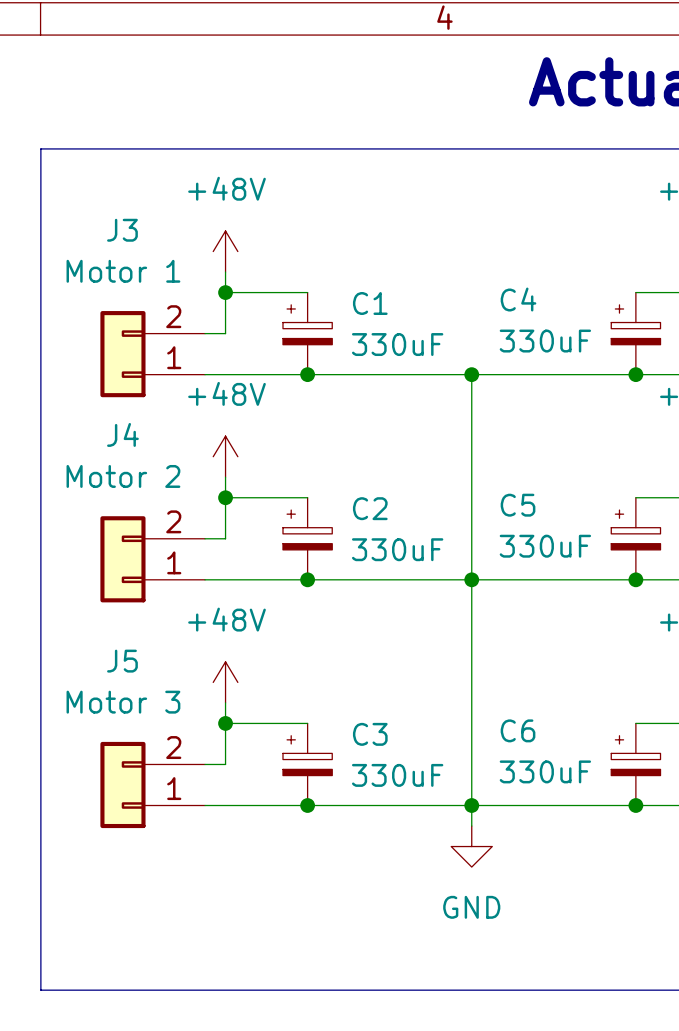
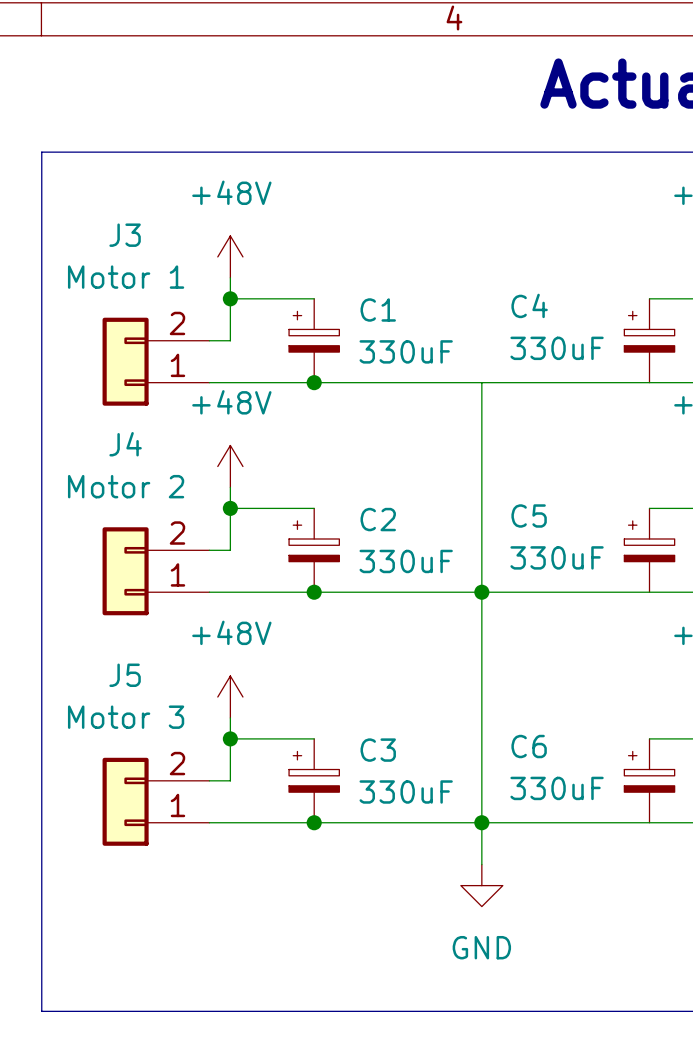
junction: (471, 374) -> none
junction: (635, 374) -> none
junction: (635, 579) -> none
junction: (635, 805) -> none
power symbol position: GND (471, 846) -> GND (481, 885)

